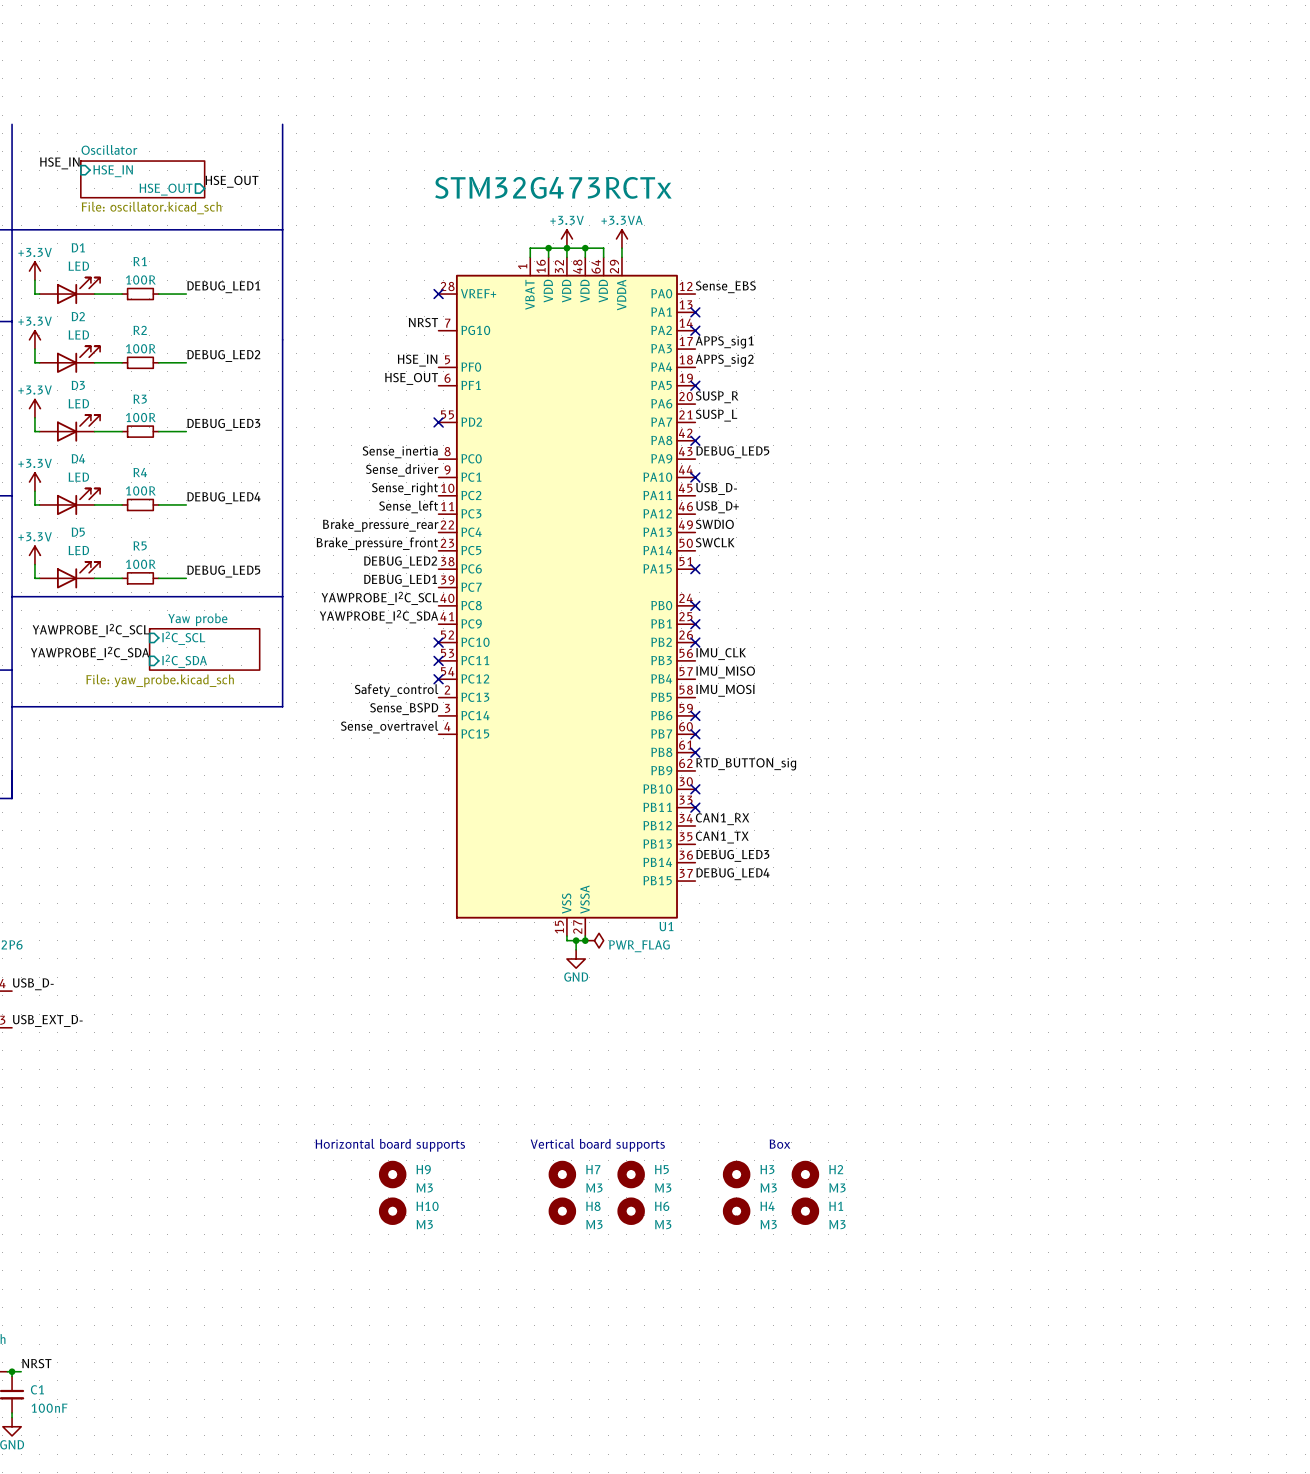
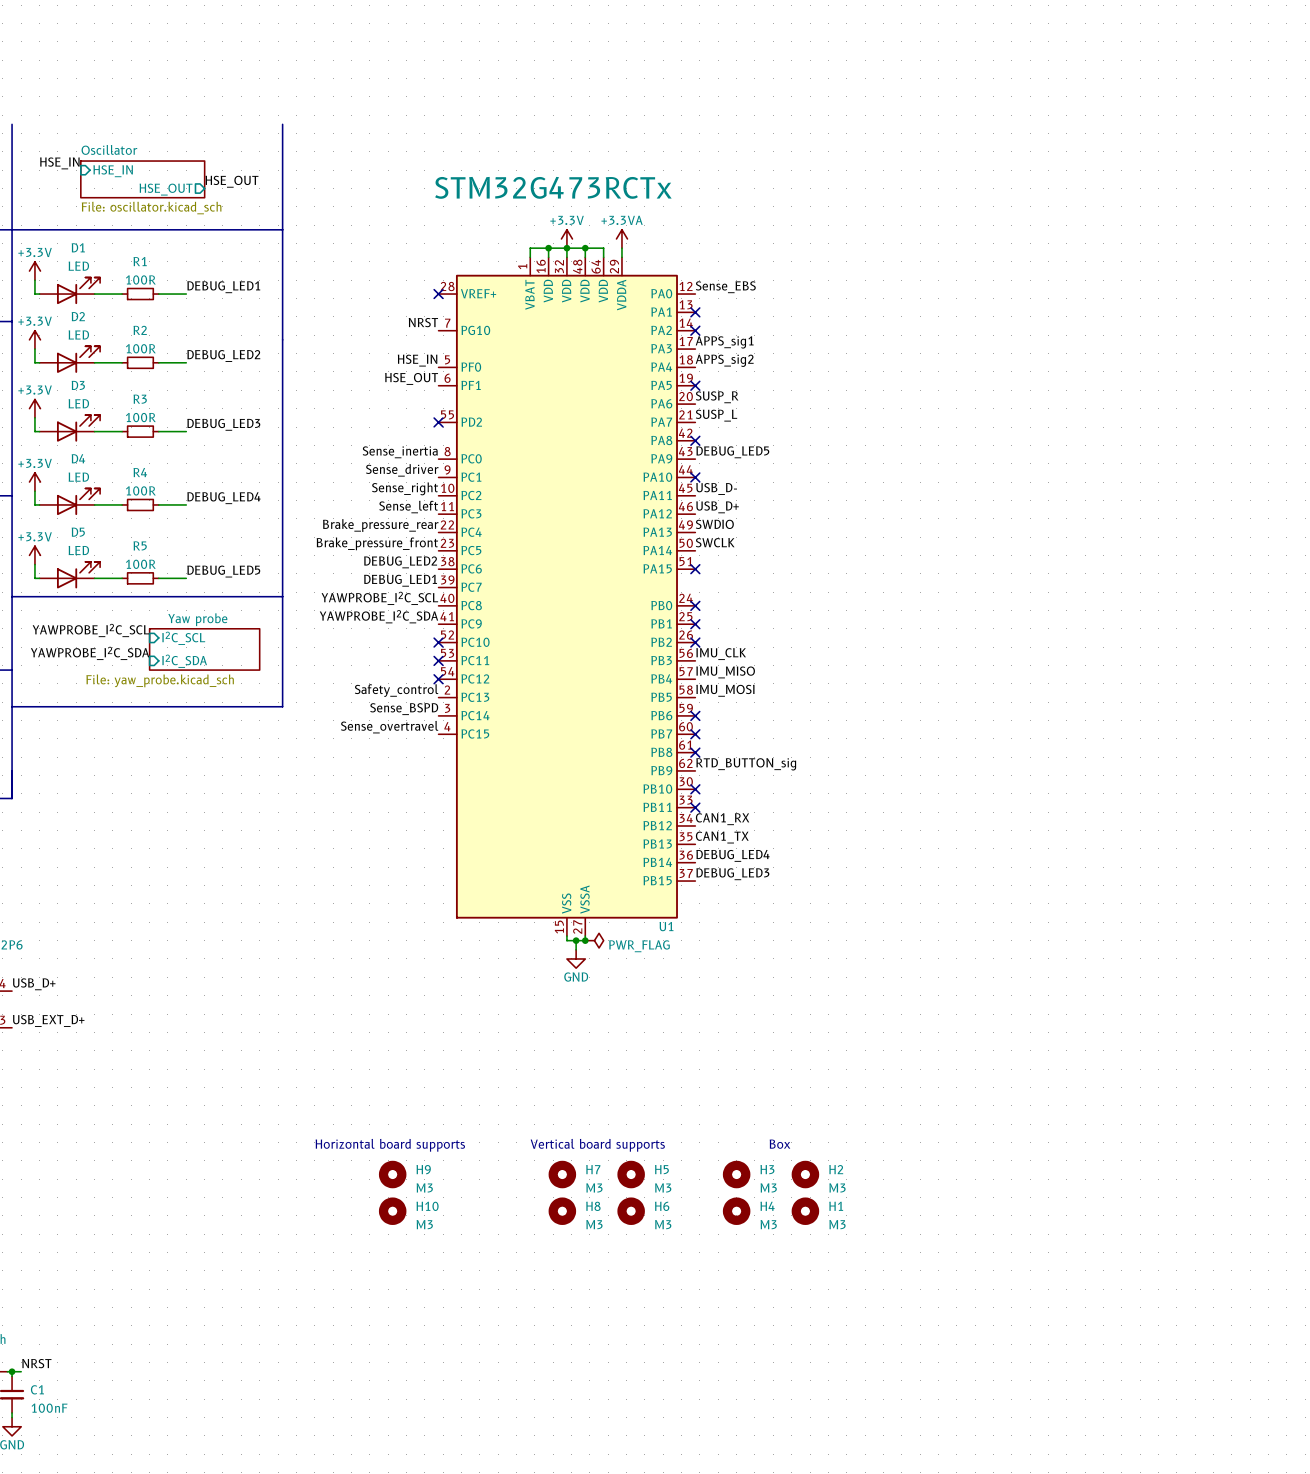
label: DEBUG_LED3 (732, 855) -> DEBUG_LED4 (732, 855)
label: DEBUG_LED4 (732, 874) -> DEBUG_LED3 (732, 874)
label: USB_D- (33, 984) -> USB_D+ (34, 984)
label: USB_EXT_D- (47, 1020) -> USB_EXT_D+ (48, 1020)

